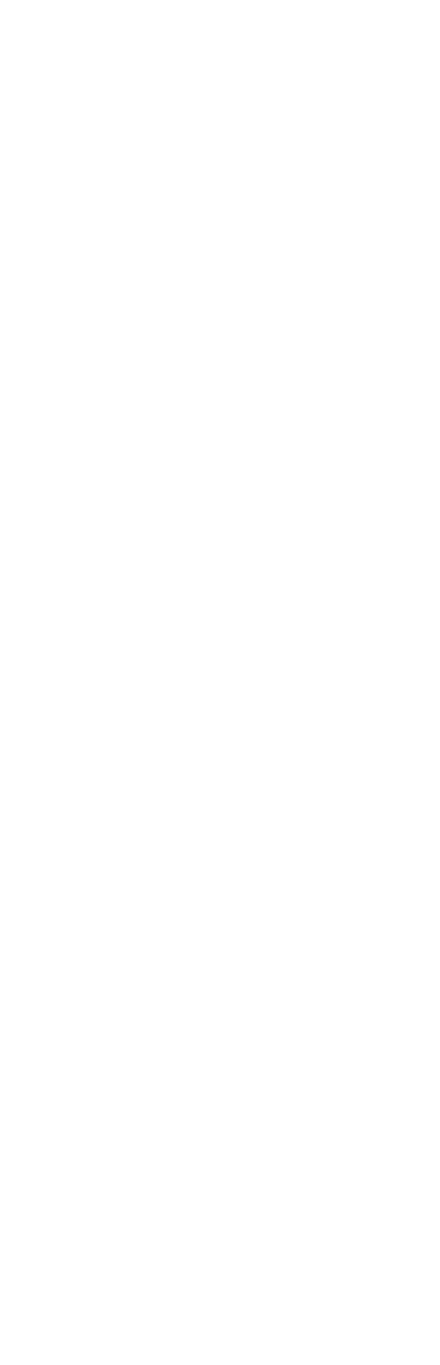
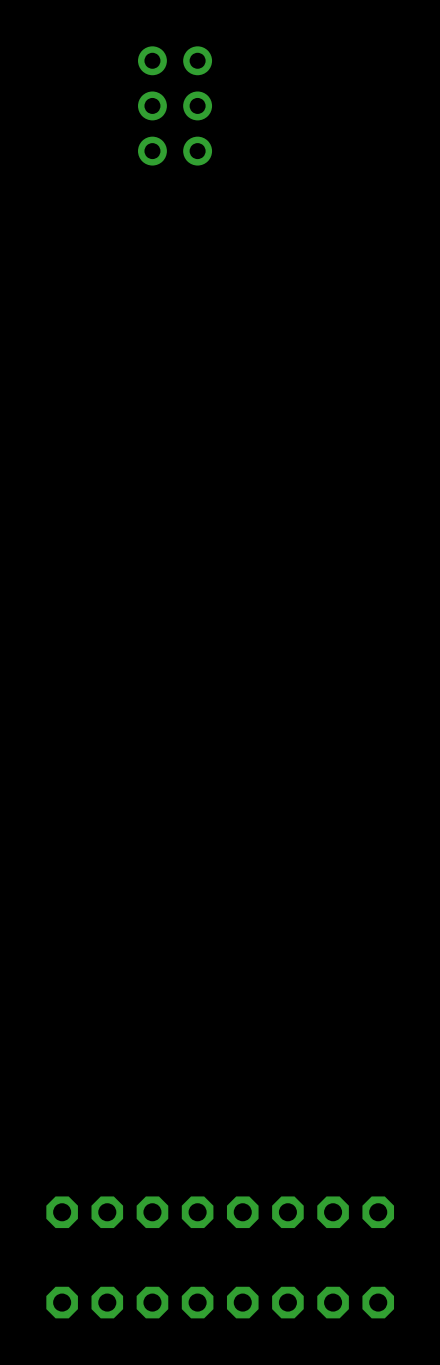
part: none -> (175, 105)
part: none -> (220, 1212)
part: none -> (220, 1302)

